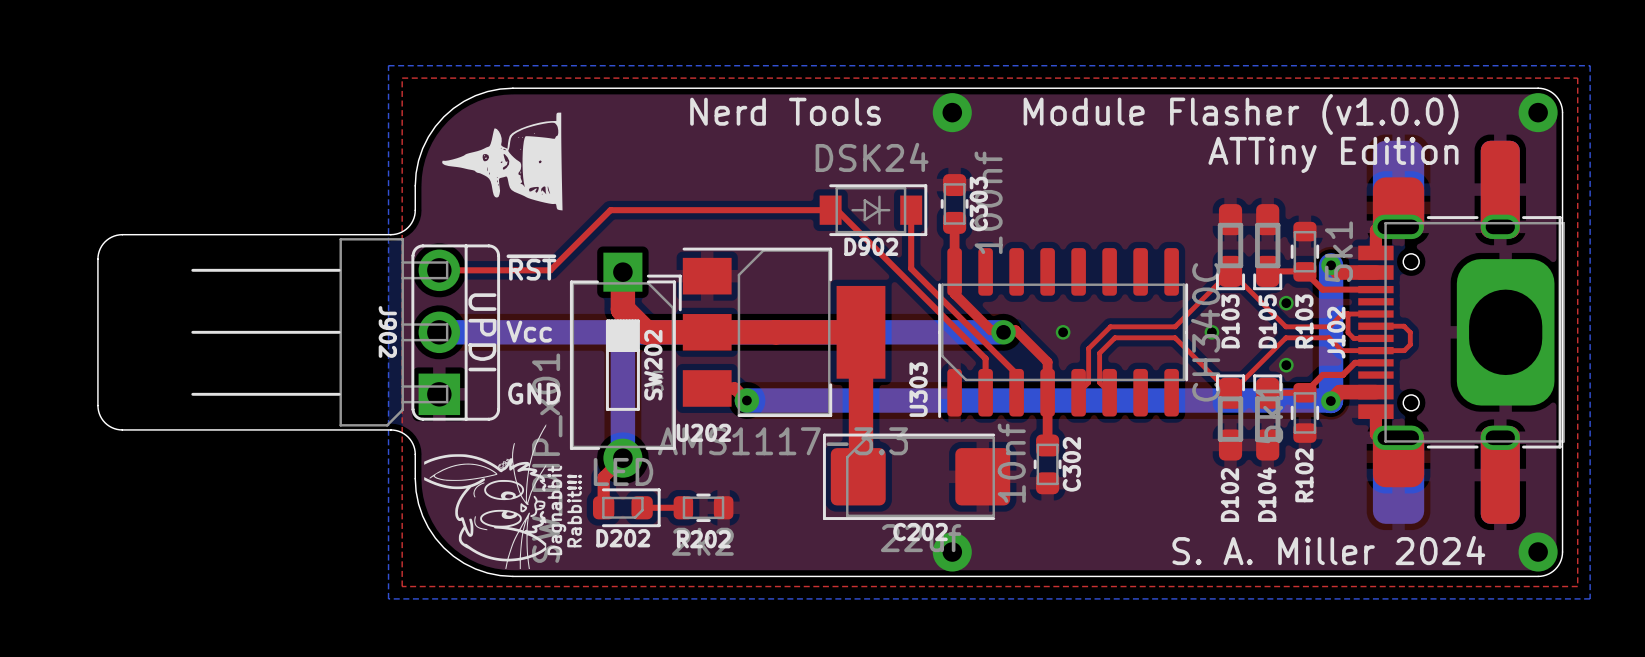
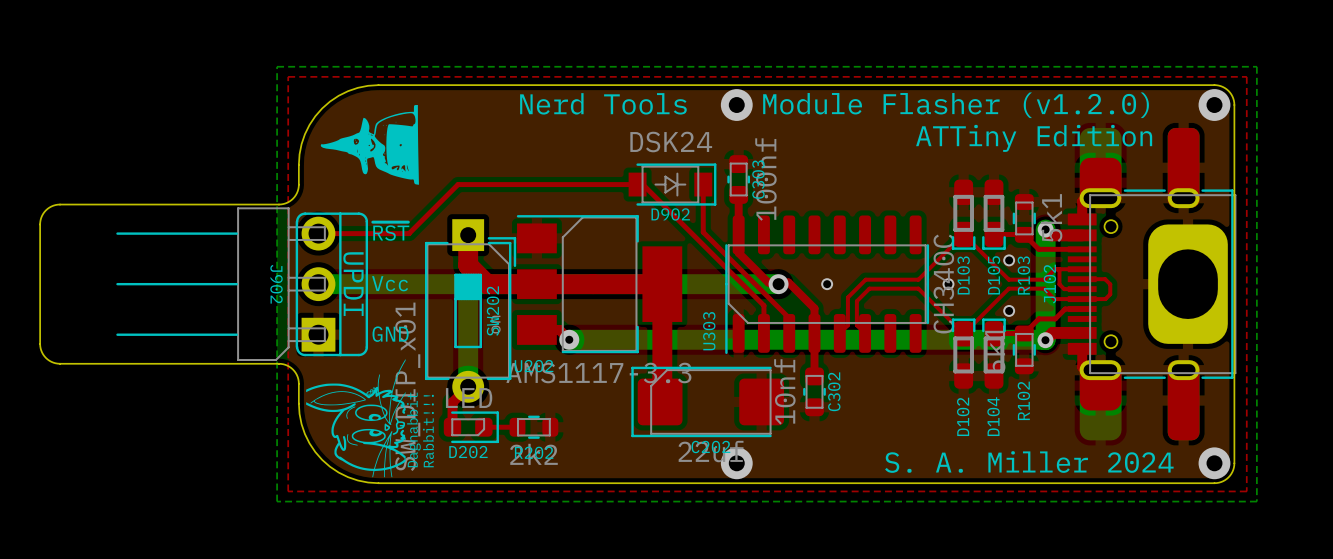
text: Module Flasher (v1.0.0) (1241, 114) -> Module Flasher (v1.2.0) (956, 105)

